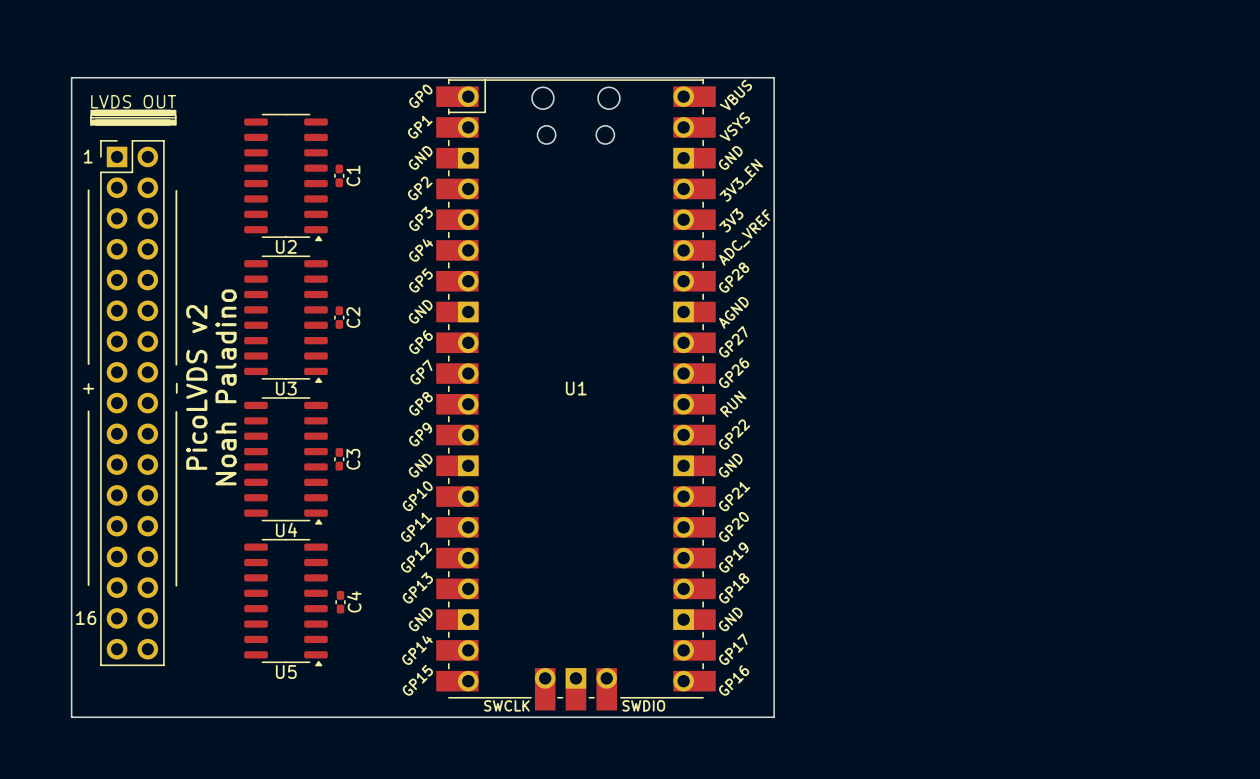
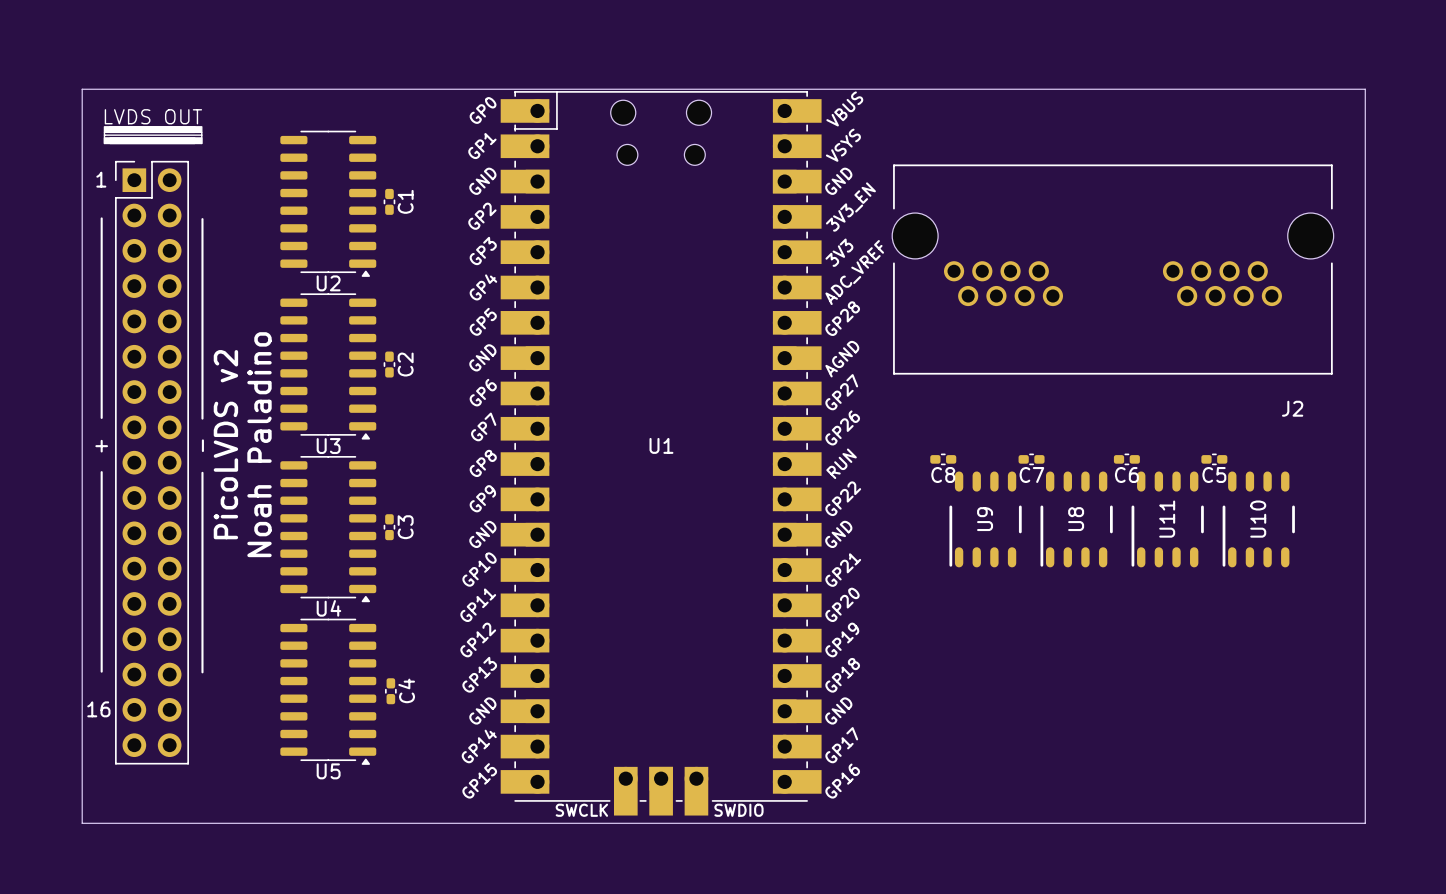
board edge: (774, 77) (774, 717) -> (888, 89) (1365, 89) (1365, 823) (888, 823)
J2: none -> (1112, 269)
C8: none -> (943, 459)
C7: none -> (1031, 459)
C6: none -> (1126, 459)
C5: none -> (1214, 459)
U9: none -> (985, 519)
U8: none -> (1076, 519)
U11: none -> (1167, 519)
U10: none -> (1258, 519)

